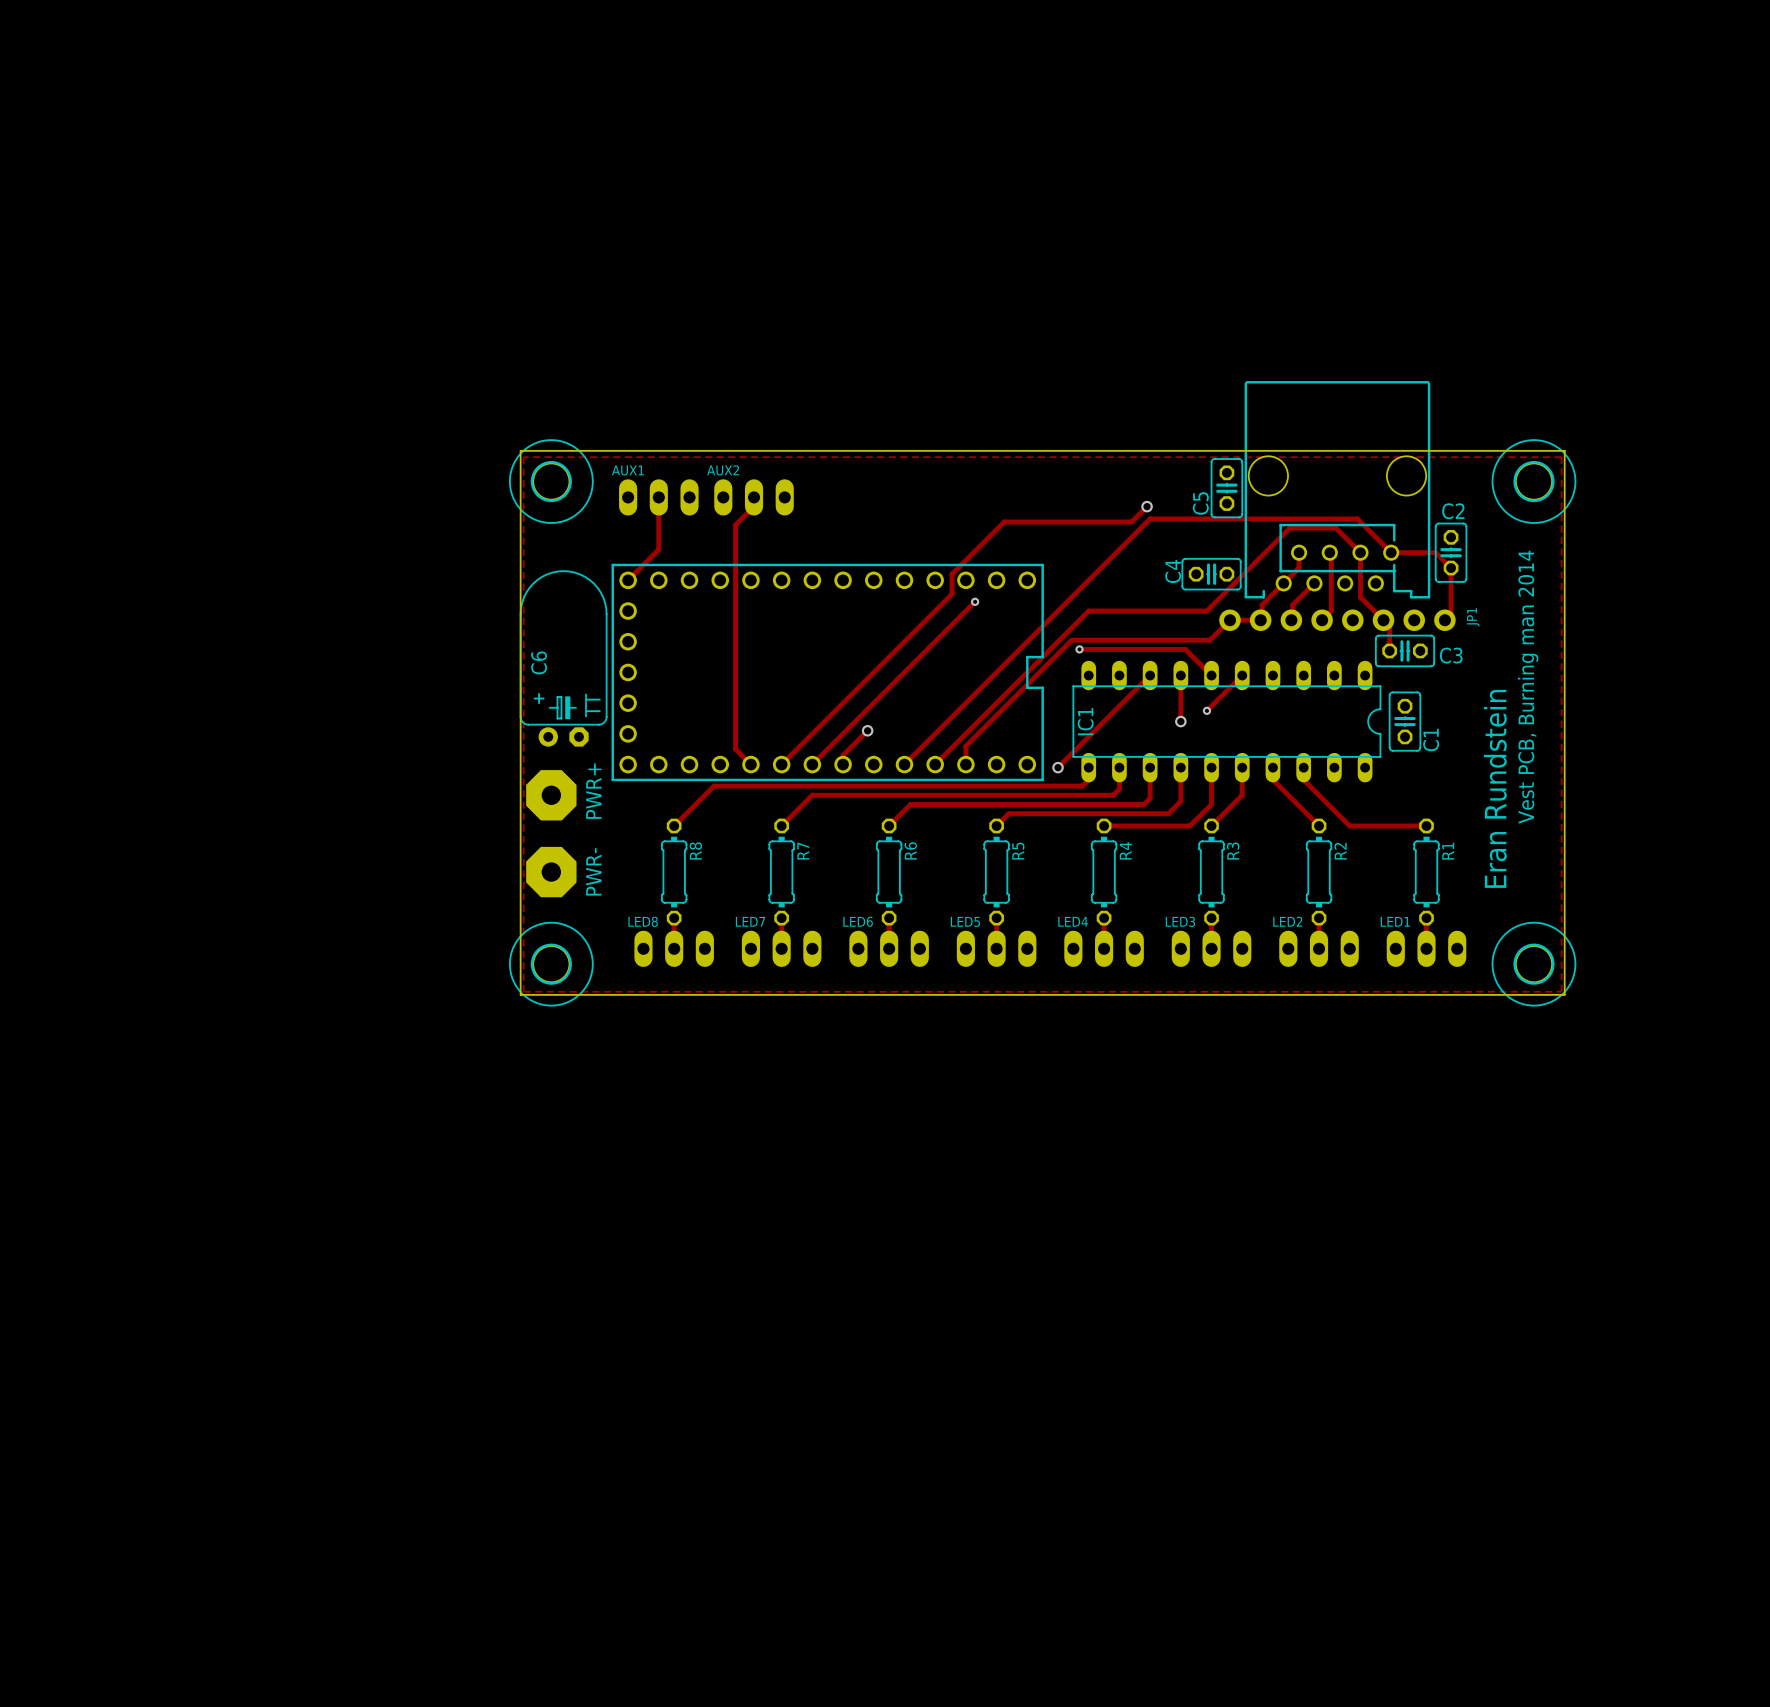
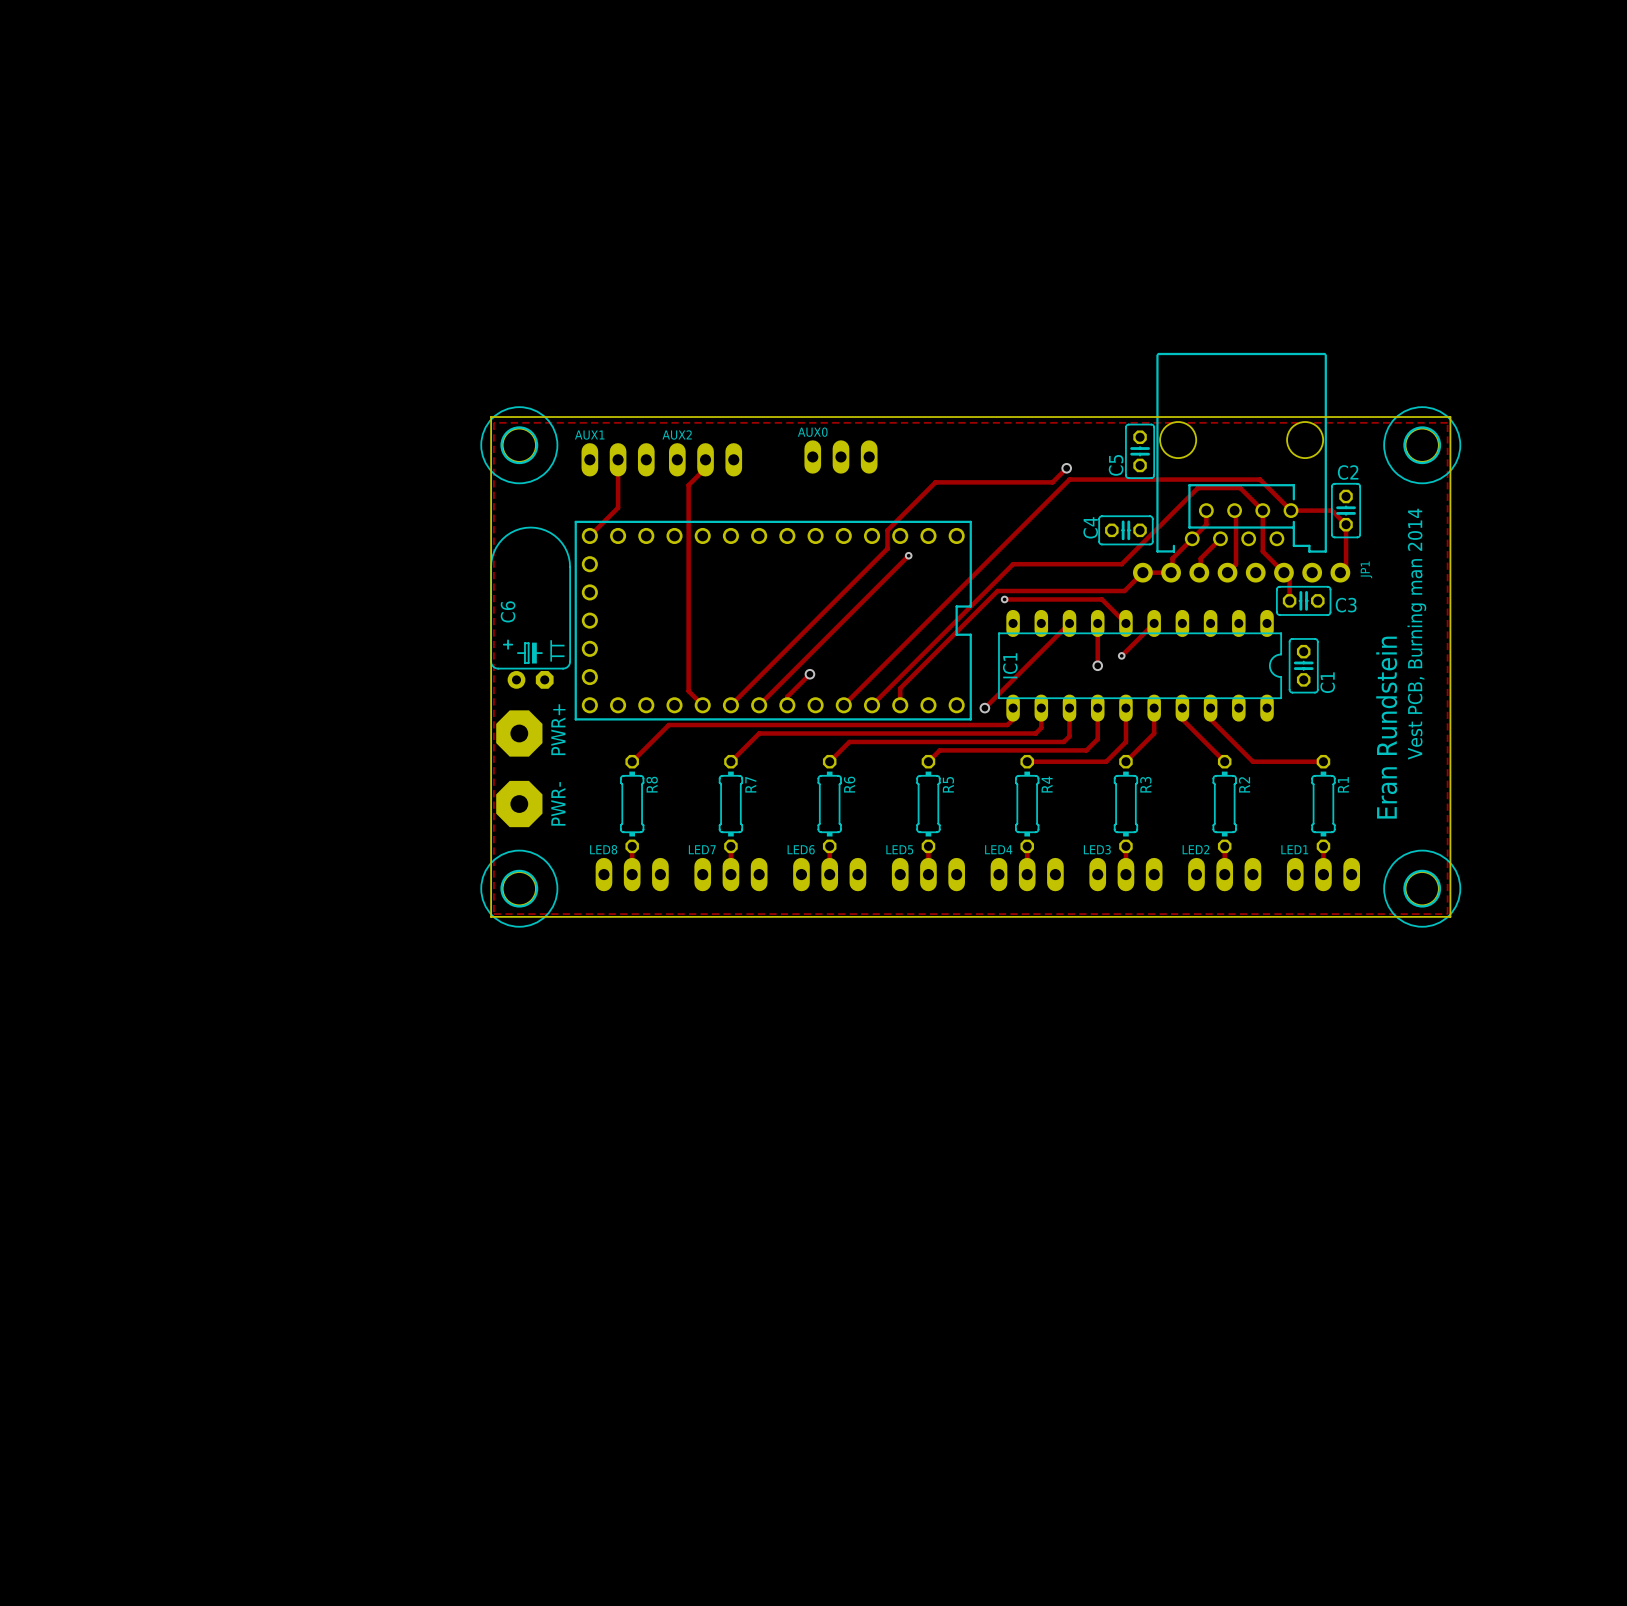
AUX0: none -> (840, 456)

